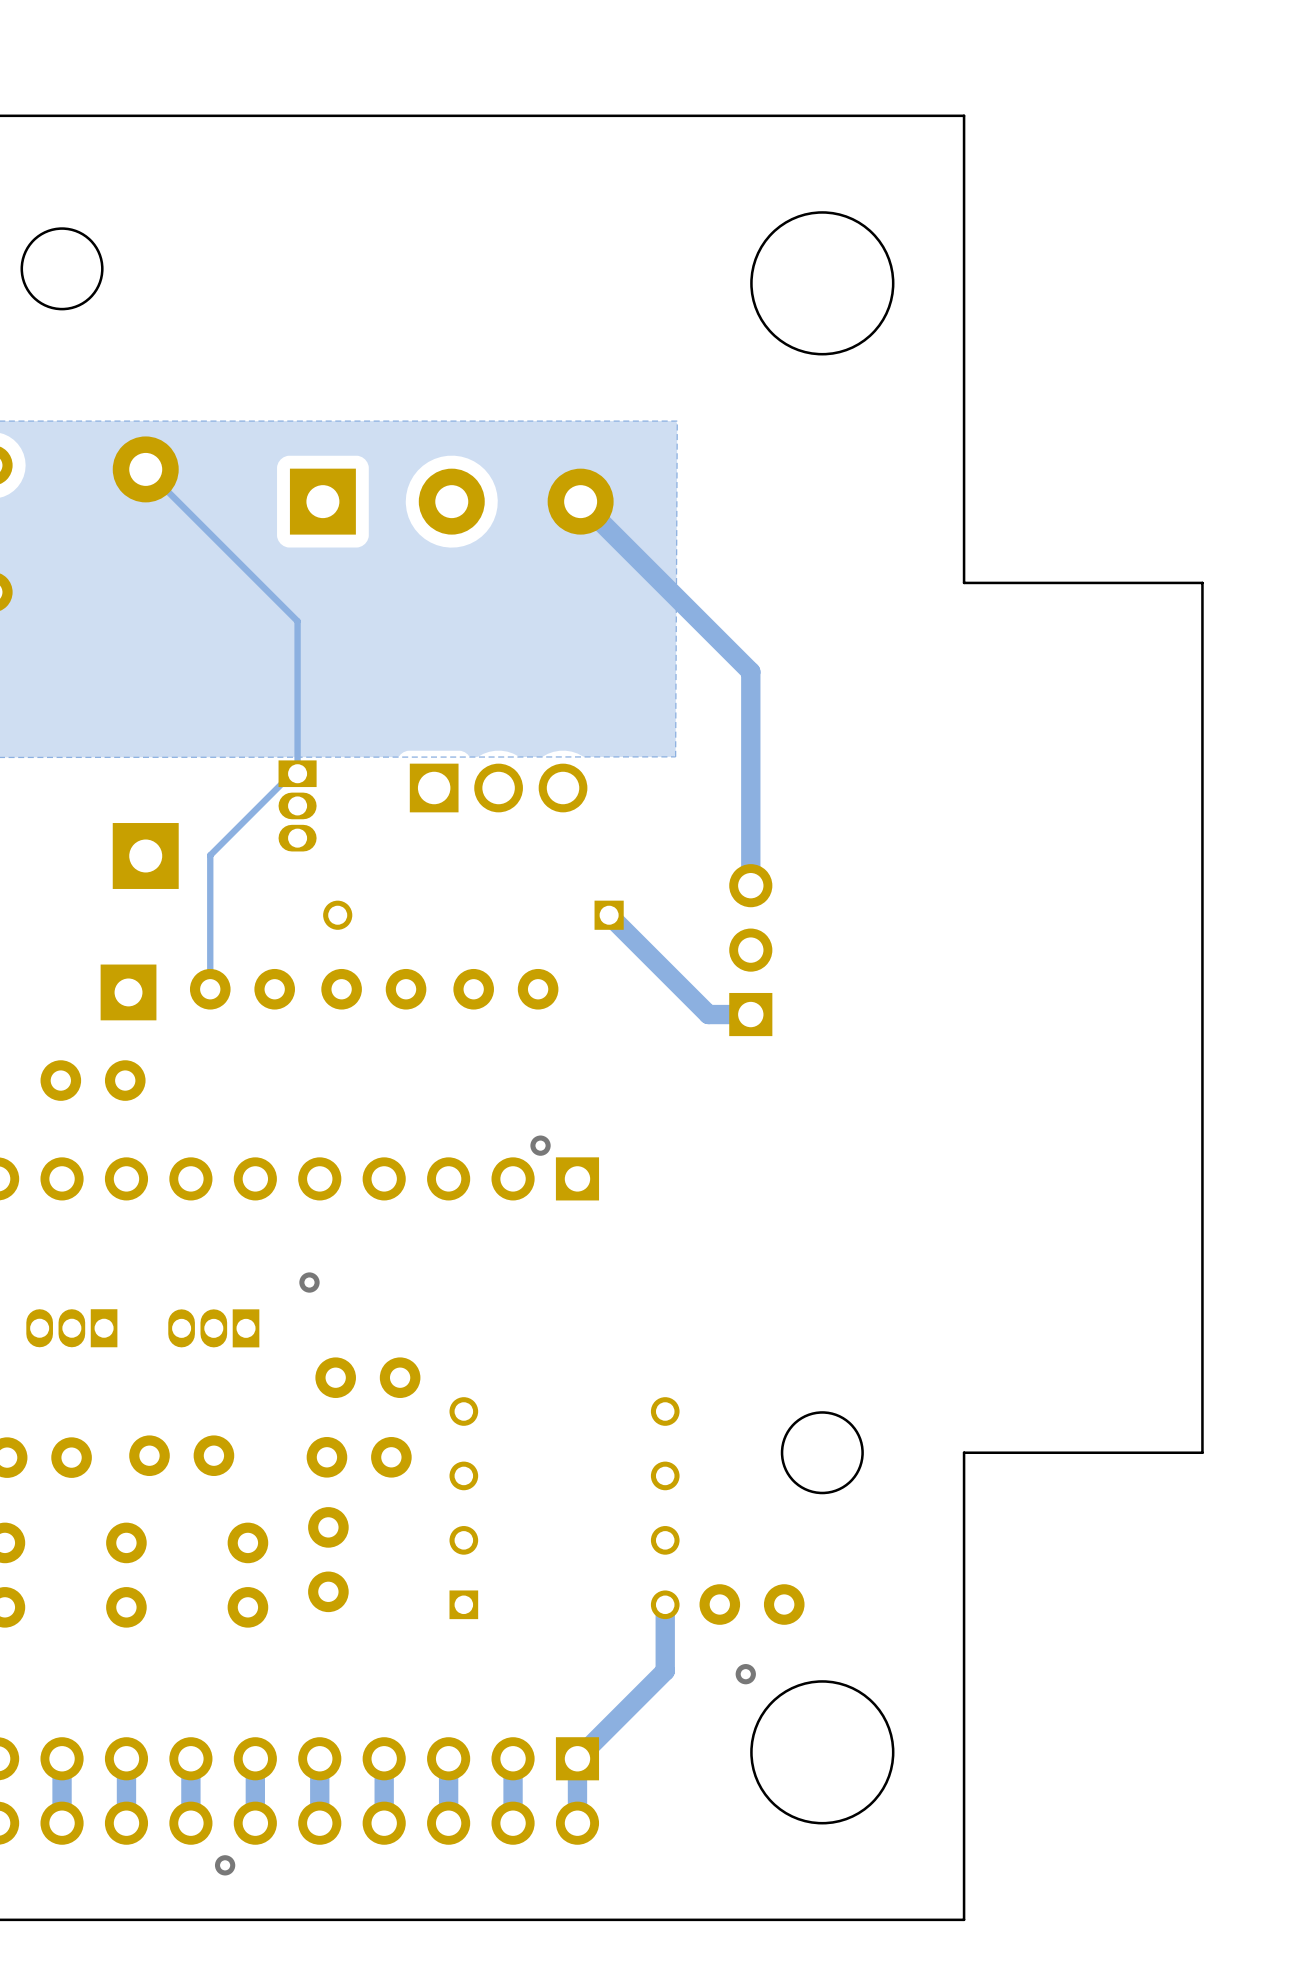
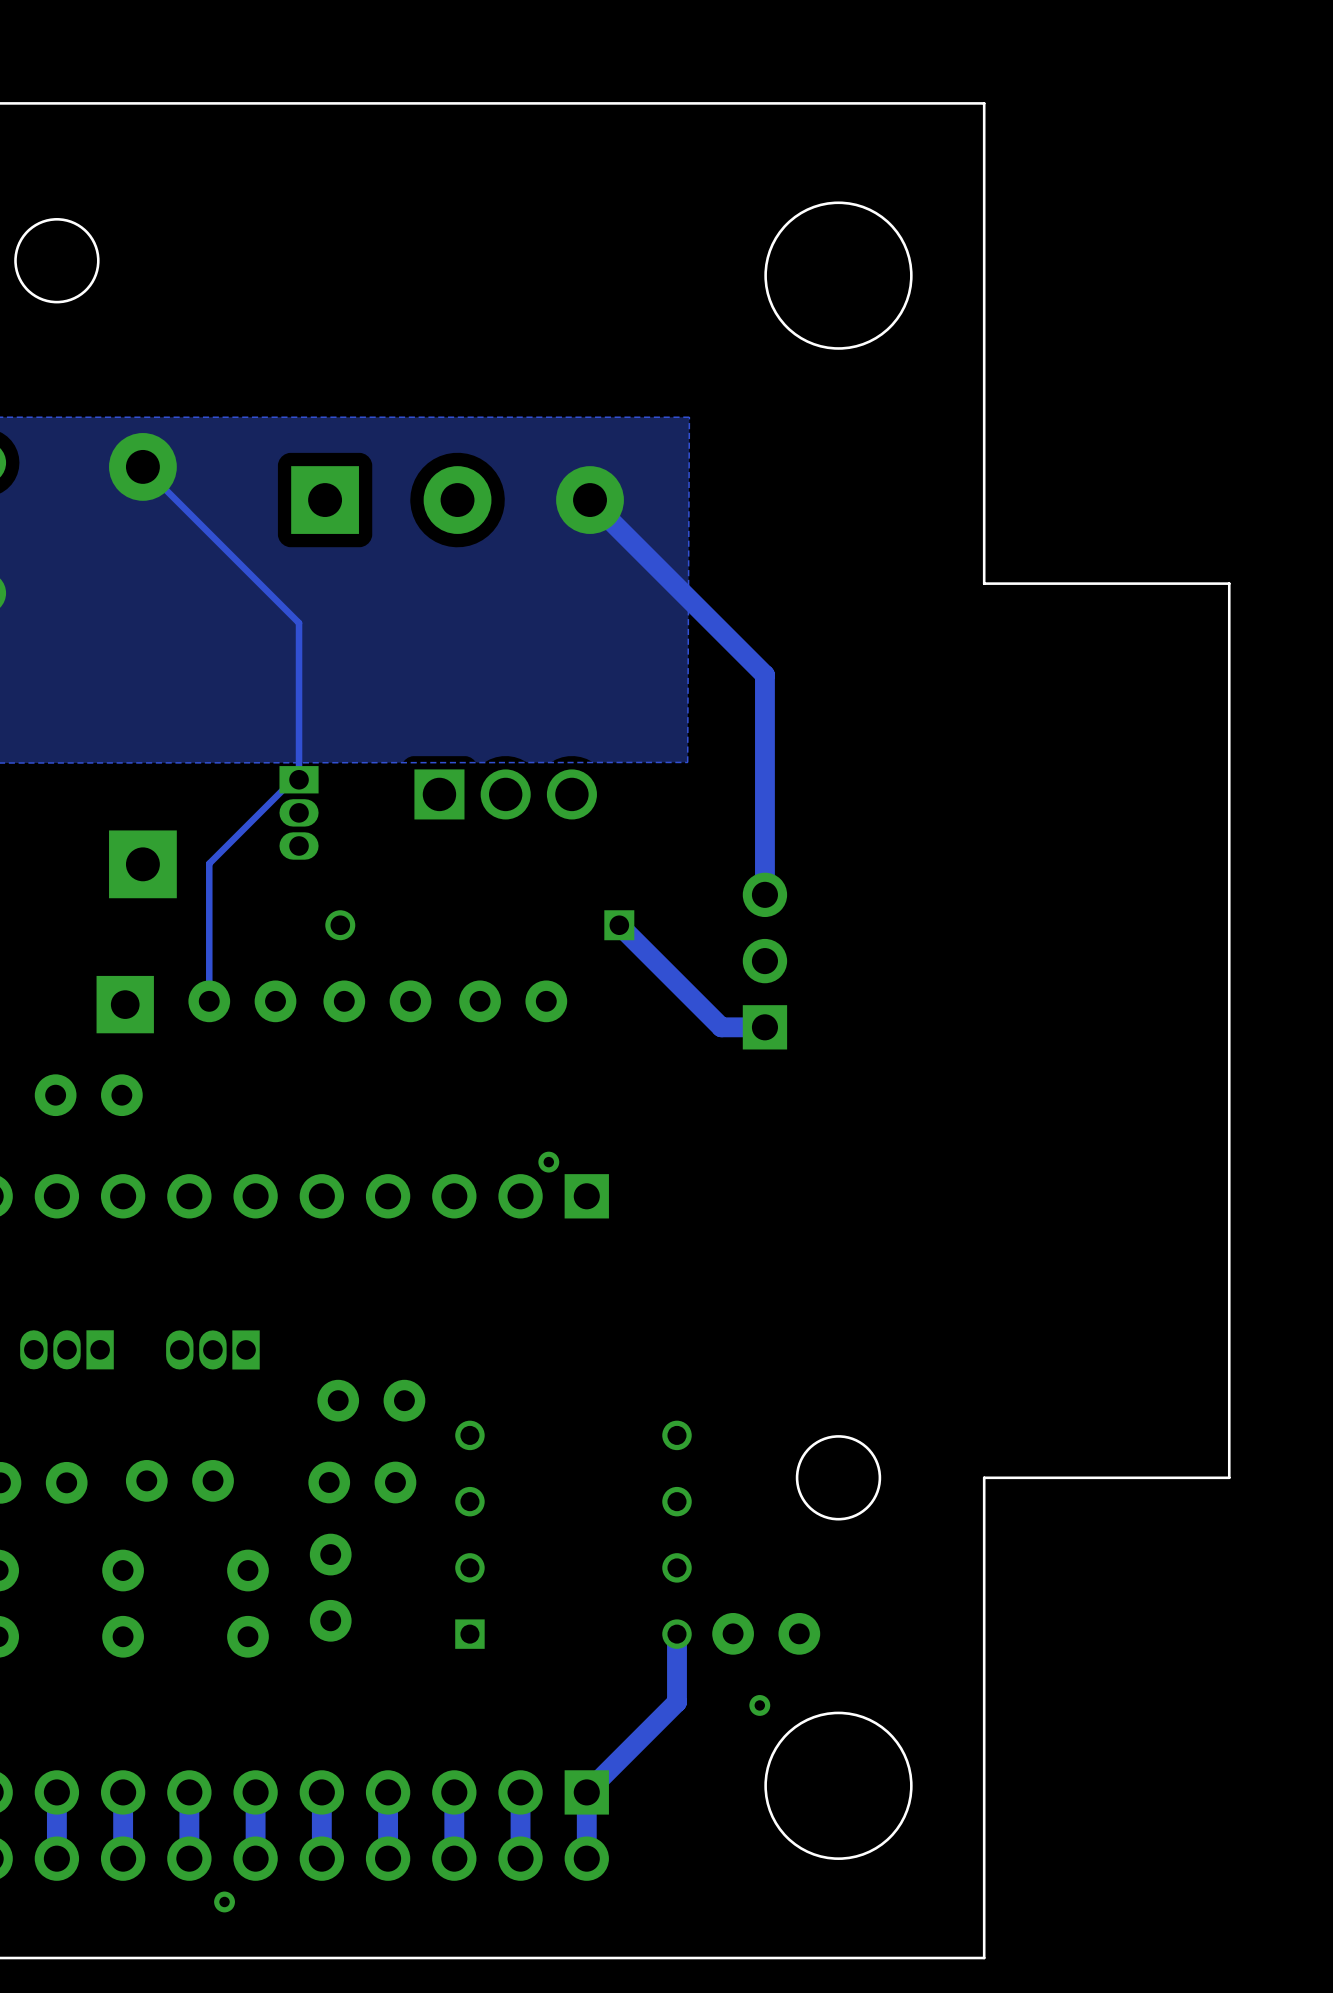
via: (309, 1282) -> none

